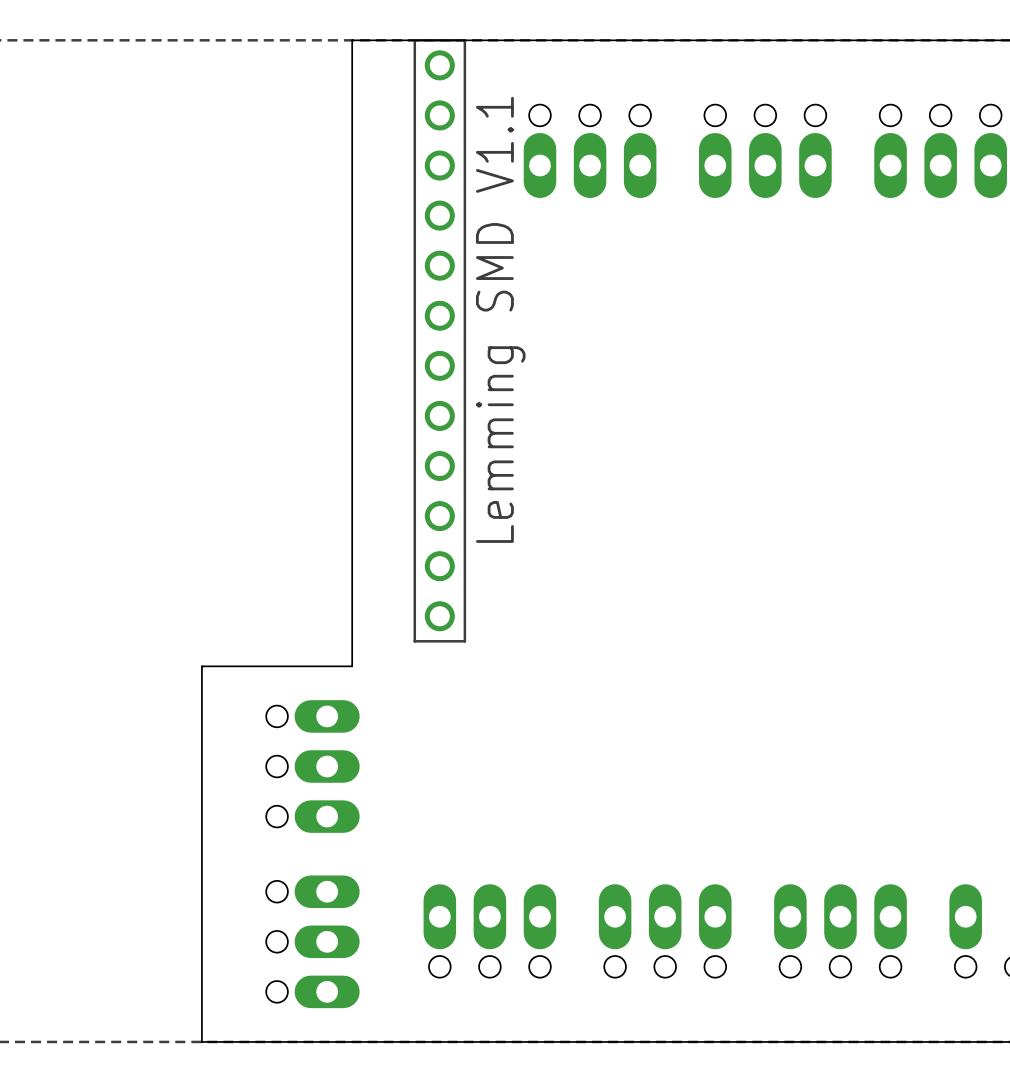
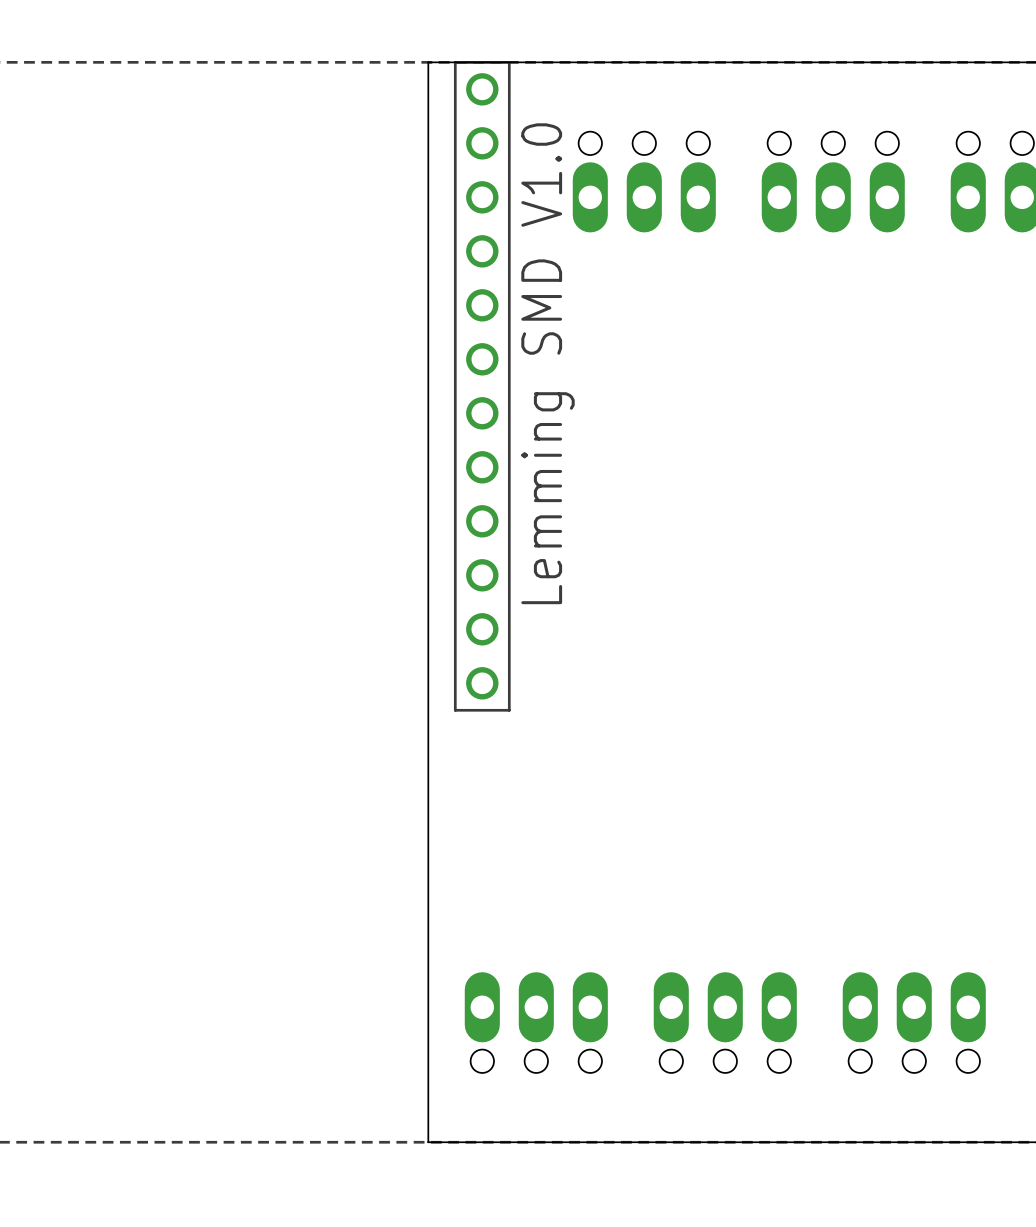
board edge: (389, 40) (352, 40) (352, 666) (201, 666) (201, 1041) (389, 1041) -> (428, 62) (428, 1142)
text: Lemming SMD V1.1 (500, 319) -> Lemming SMD V1.0 (548, 363)
part: (312, 766) -> none
part: (312, 941) -> none

